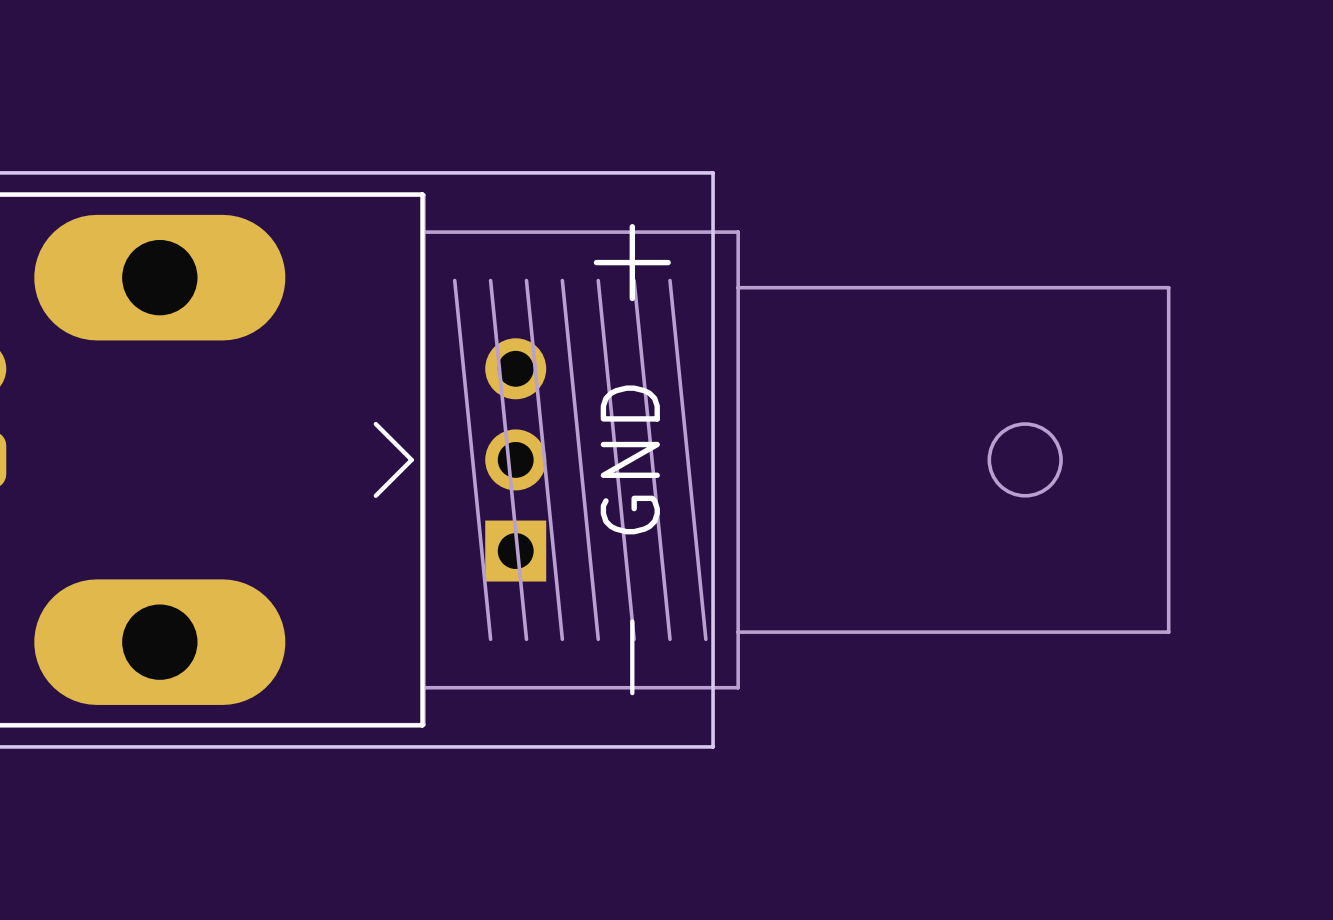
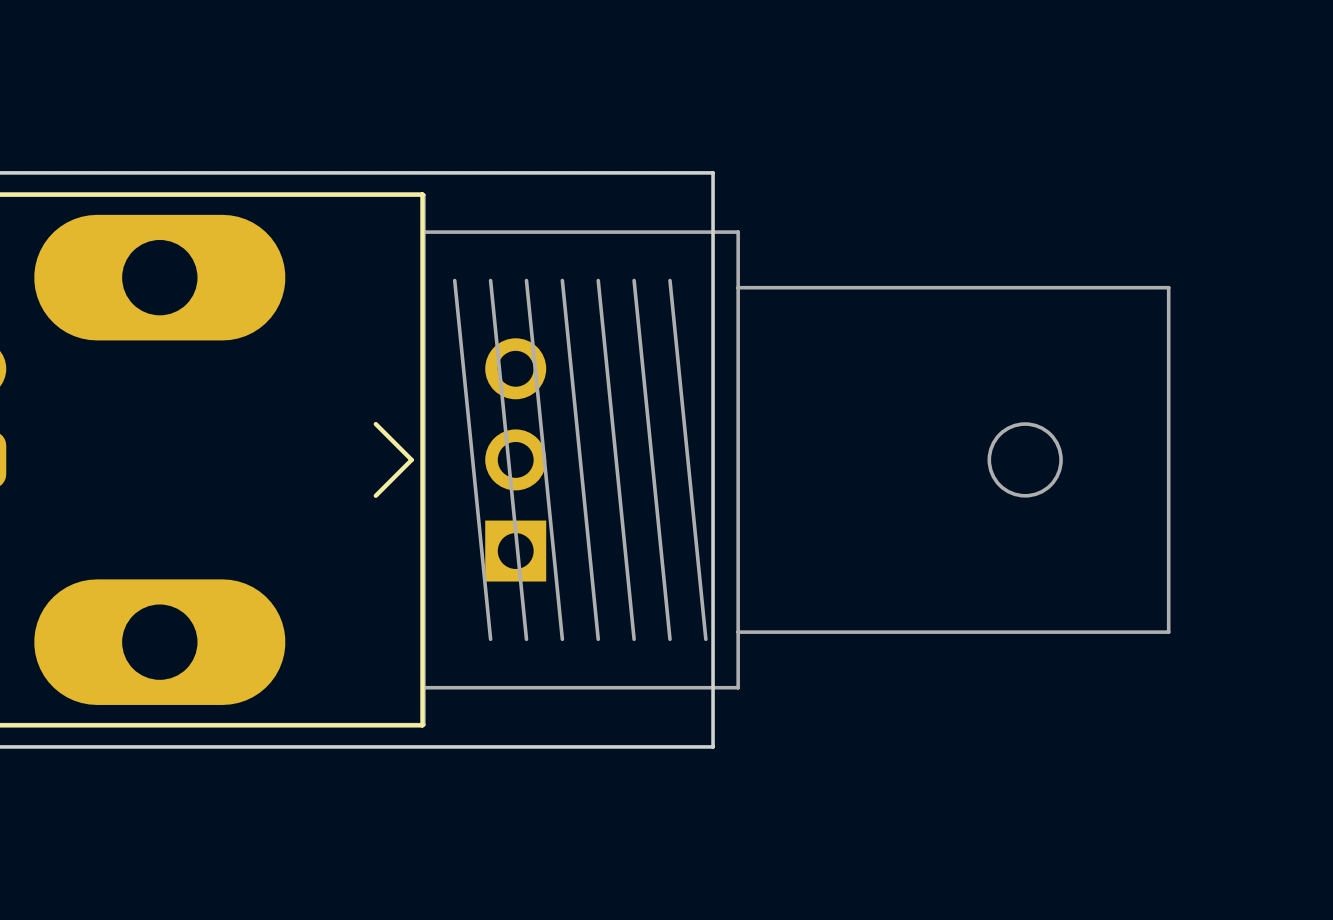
line: (632, 226) (632, 298) -> none
line: (596, 262) (668, 262) -> none
text: GND (630, 459) -> none
line: (632, 621) (632, 693) -> none

